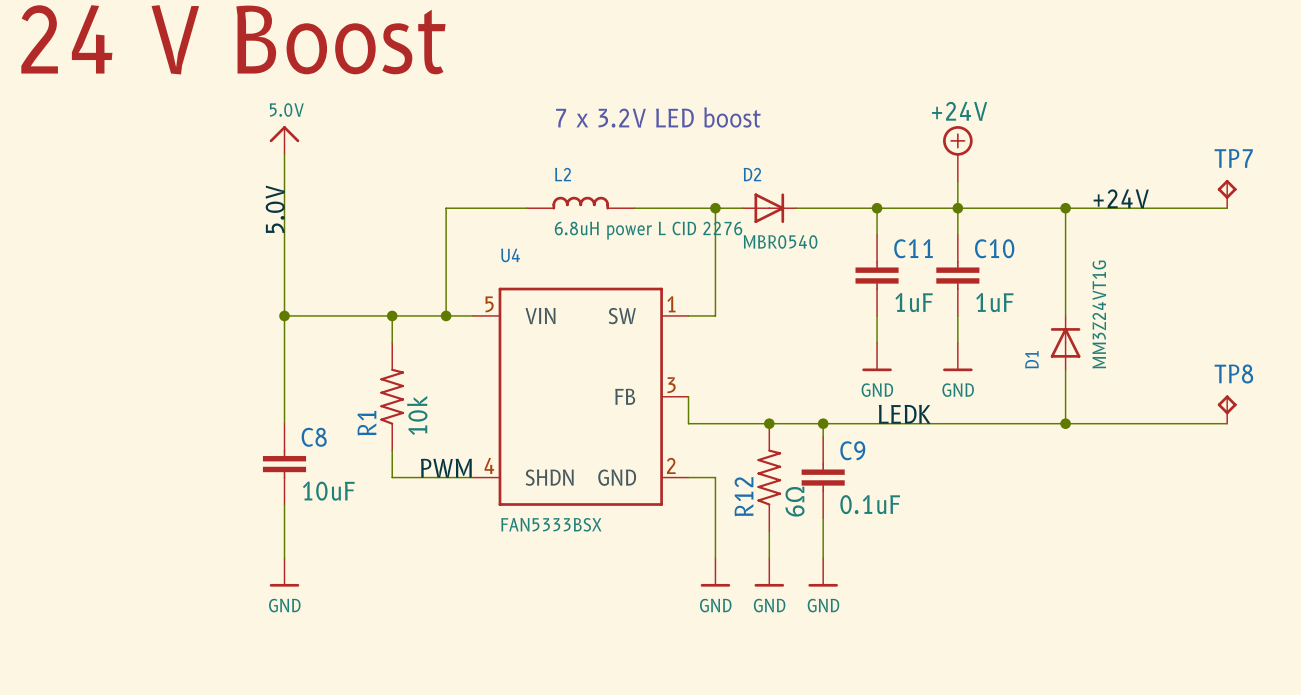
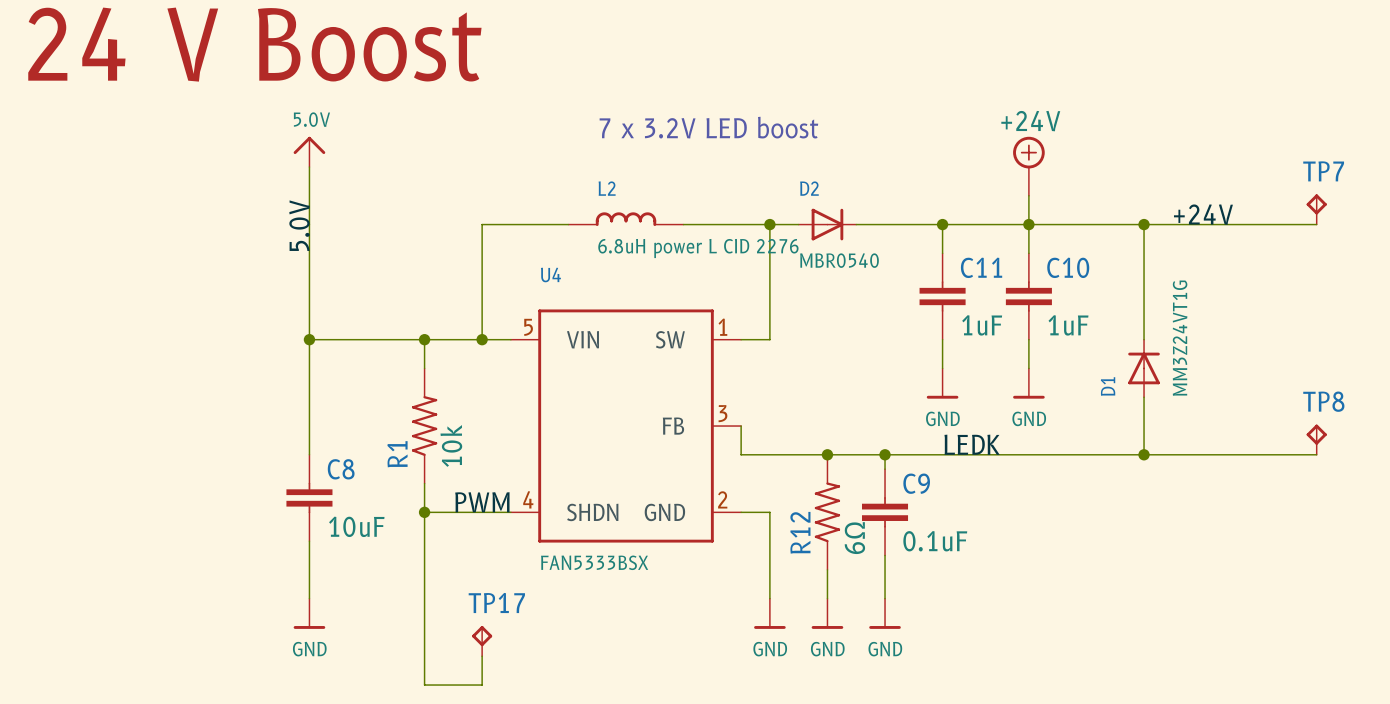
wire: none -> (424, 512) (424, 685) (482, 685) (482, 656)
junction: none -> (424, 512)
TP17: none -> (482, 641)

